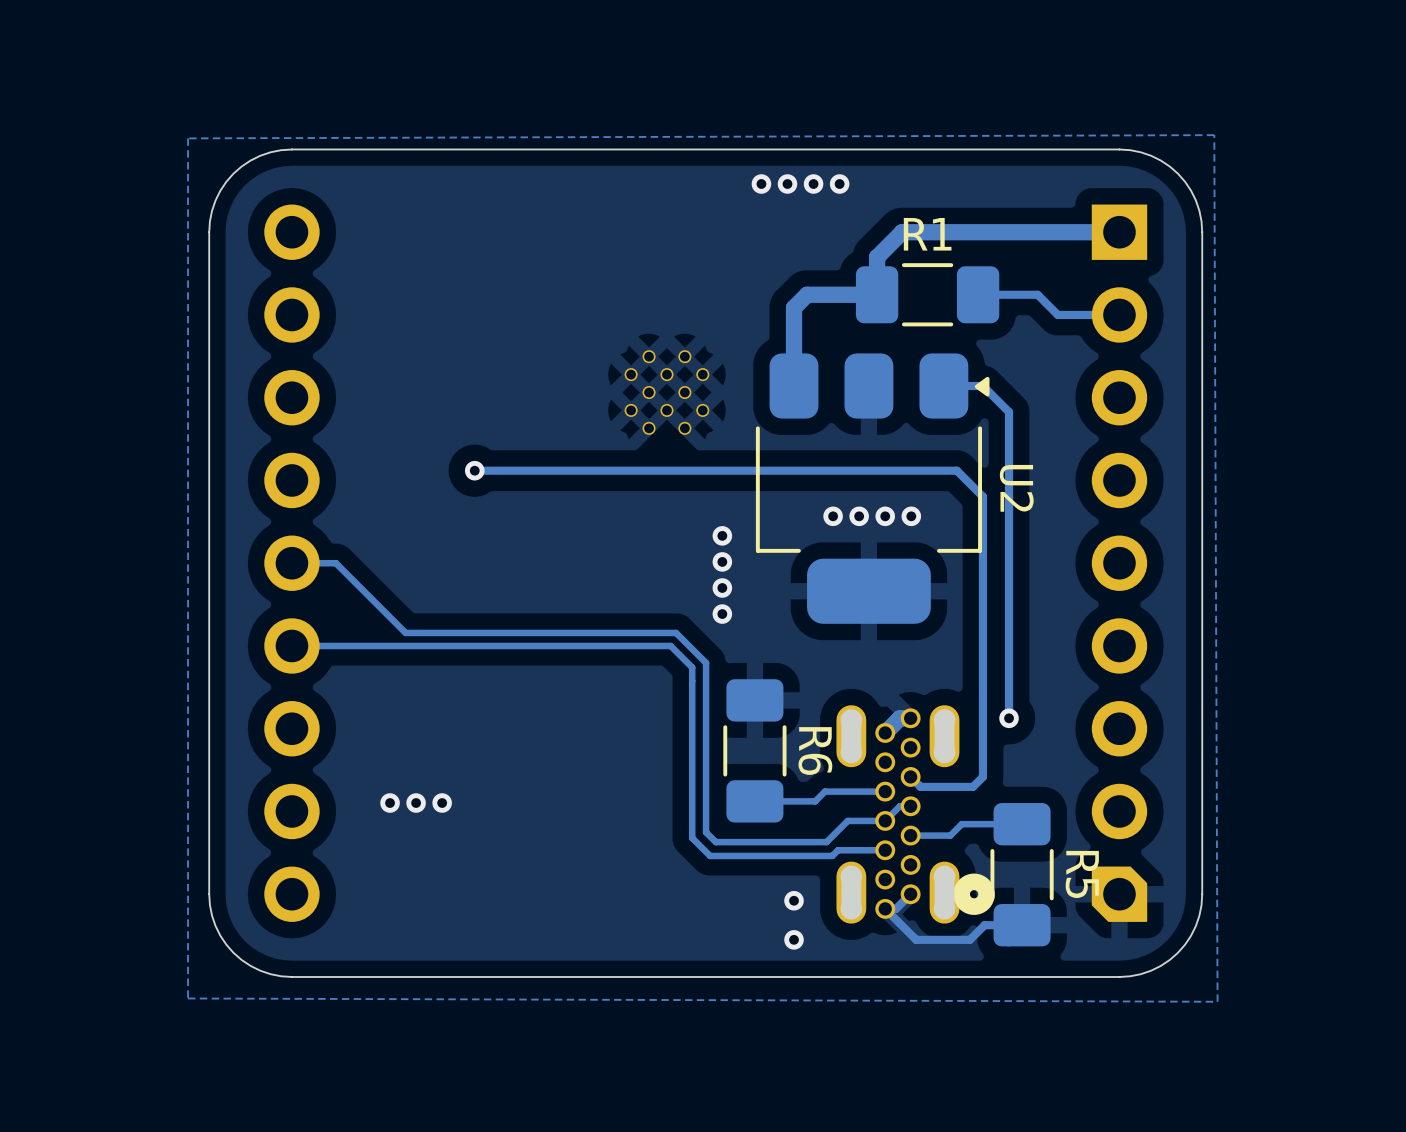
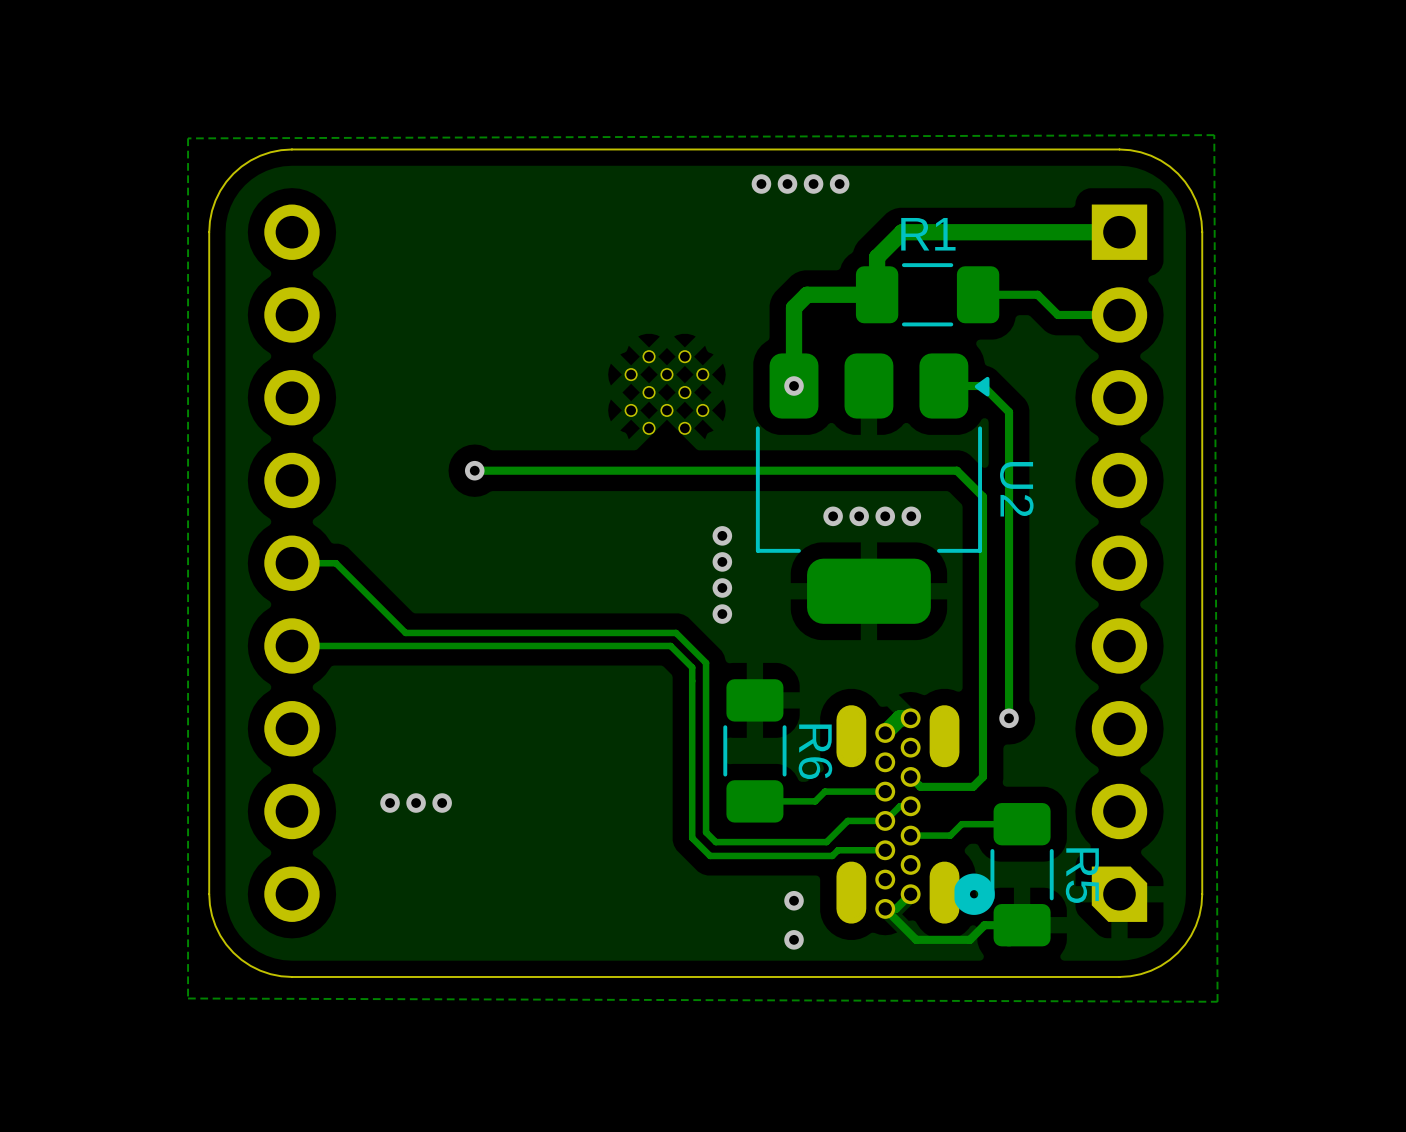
via: none -> (794, 386)

